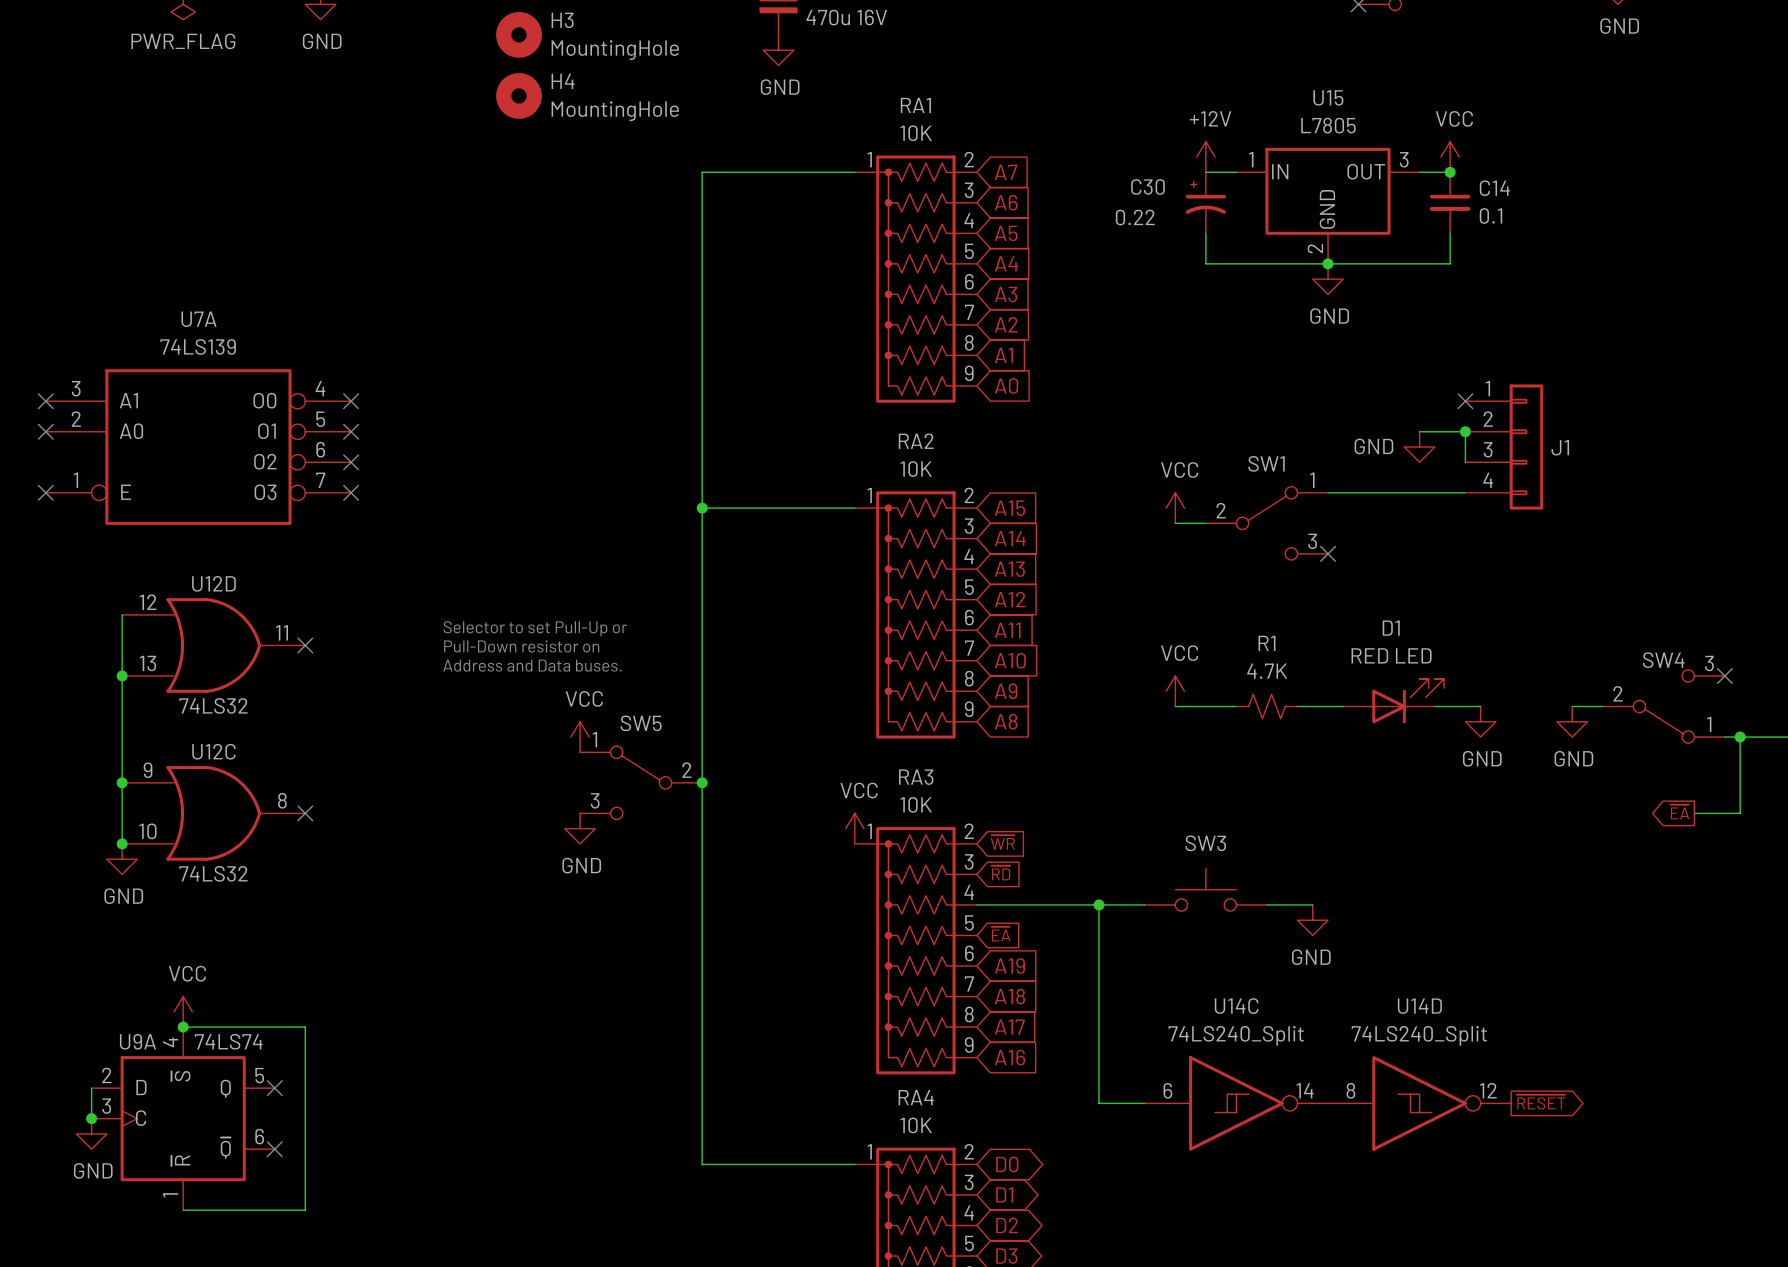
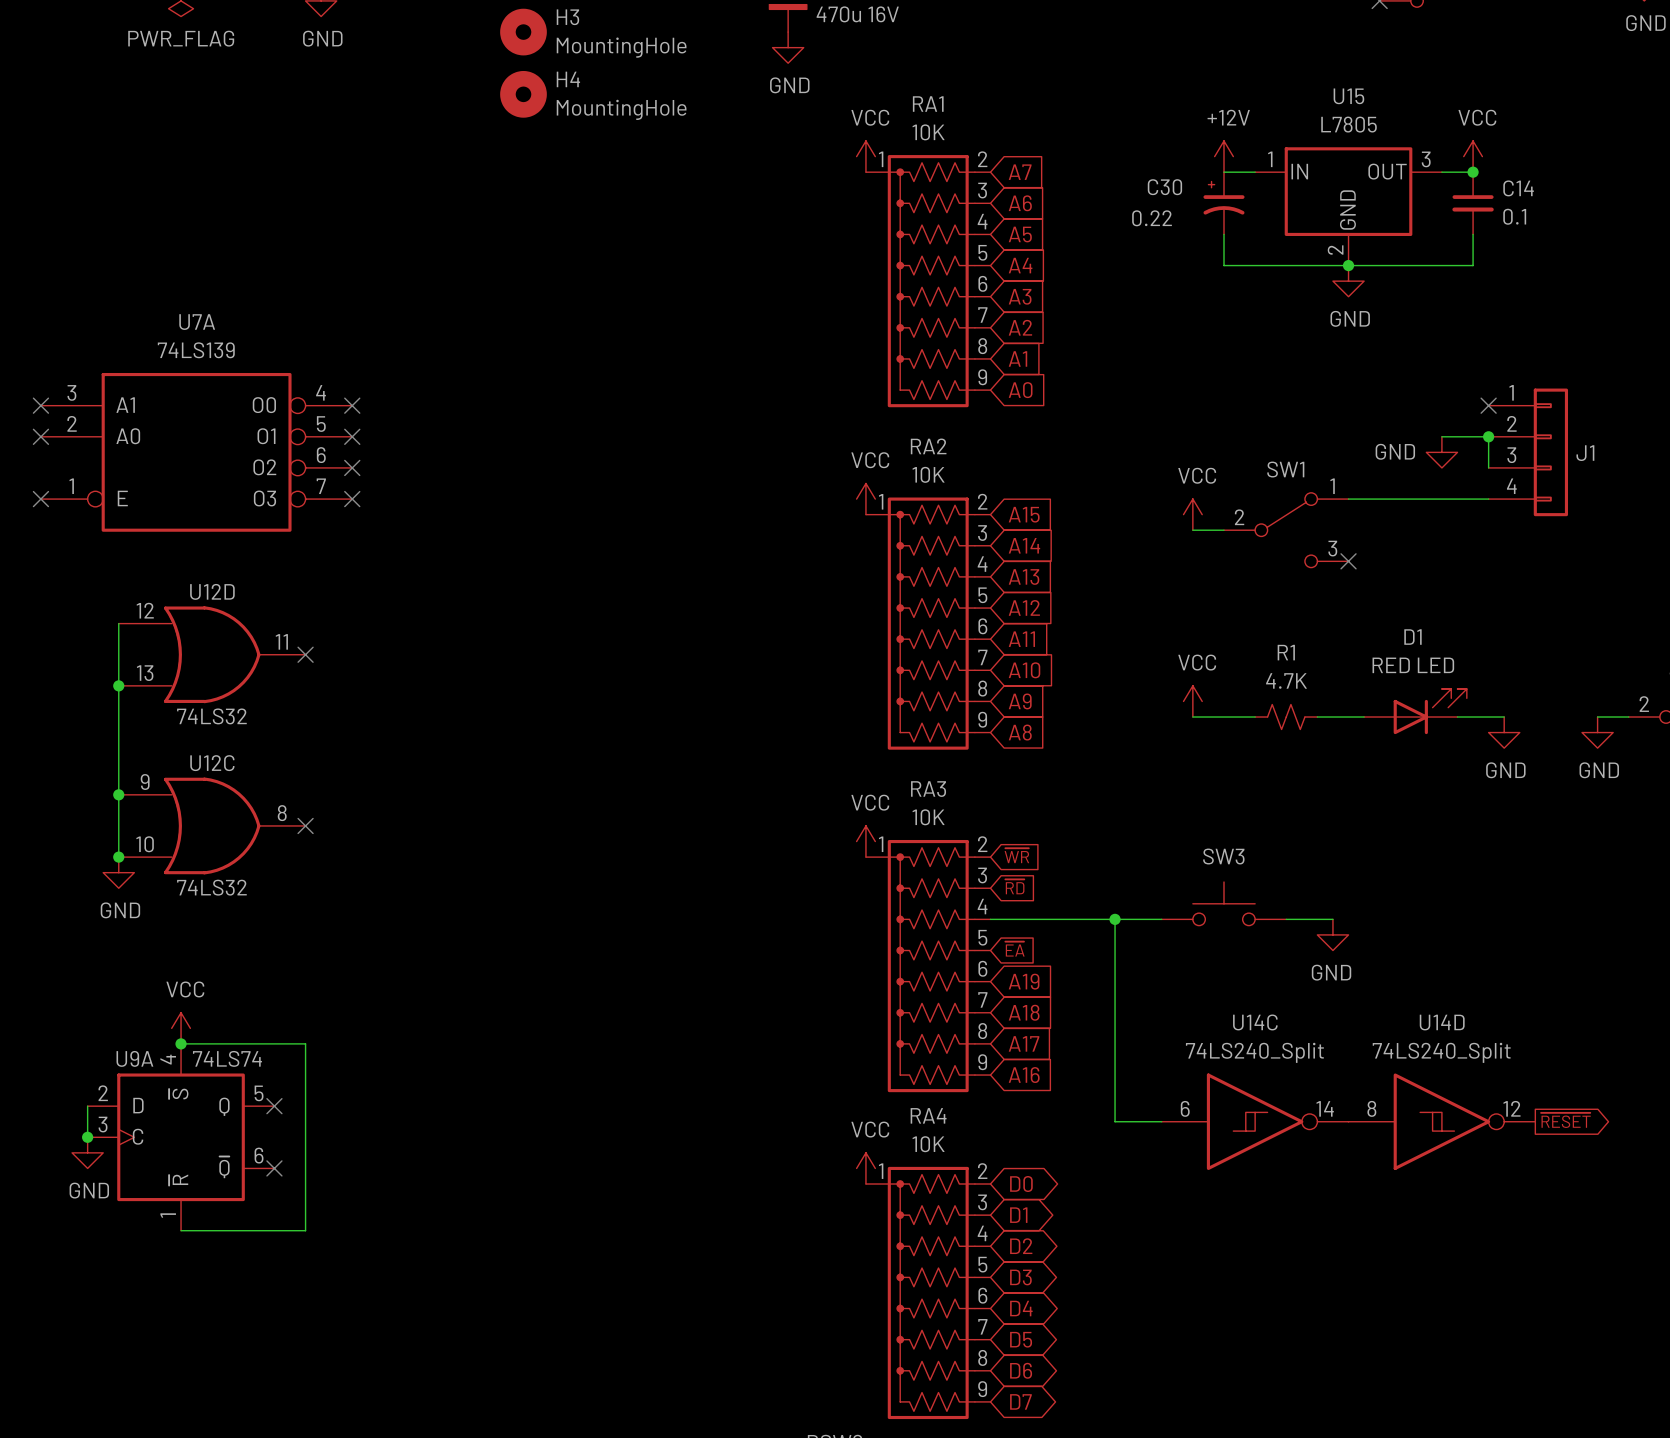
power symbol: none -> VCC (865, 156)
wire: (854, 172) (702, 172) (702, 1164) (854, 1164) -> none
power symbol: none -> VCC (865, 499)
wire: (702, 508) (854, 508) -> none
junction: (702, 508) -> none
text: Selector to set Pull-Up or (535, 628) -> none
text: Pull-Down resistor on (521, 646) -> none
text: Address and Data buses. (532, 665) -> none
power symbol: VCC (580, 737) -> none
SW5: (641, 782) -> none
junction: (702, 782) -> none
power symbol: GND (580, 828) -> none
power symbol: none -> VCC (865, 1168)

